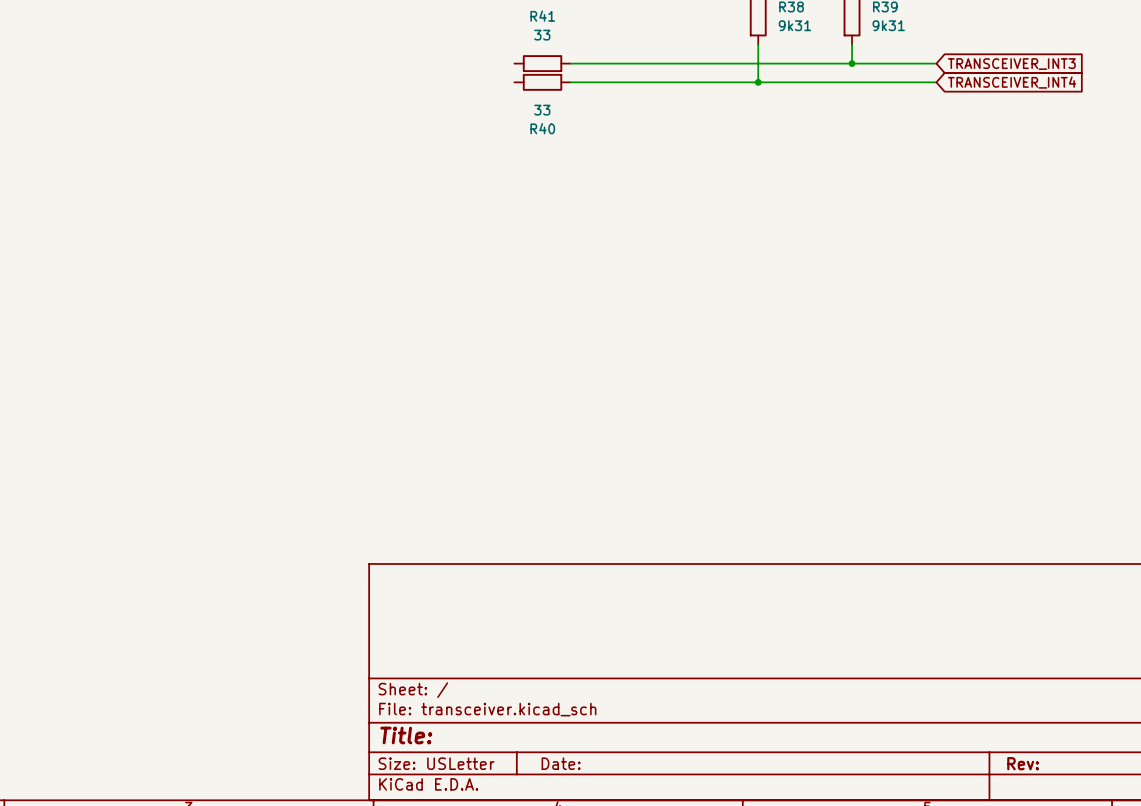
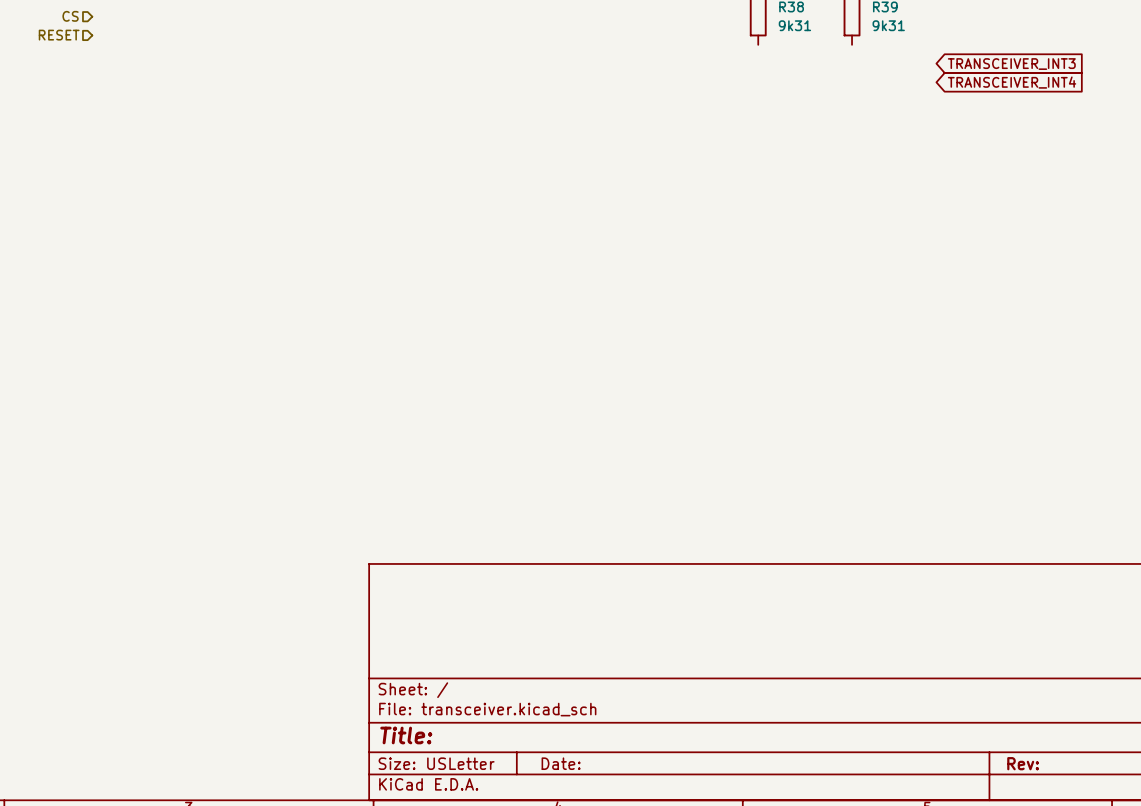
hierarchical label: none -> CS (70, 16)
hierarchical label: none -> RESET (59, 35)
wire: (758, 44) (758, 82) -> none
wire: (852, 44) (852, 63) -> none
R41: 33 (542, 63) -> none
wire: (570, 63) (936, 63) -> none
junction: (852, 63) -> none
R40: 33 (542, 82) -> none
wire: (570, 82) (936, 82) -> none
junction: (758, 82) -> none

